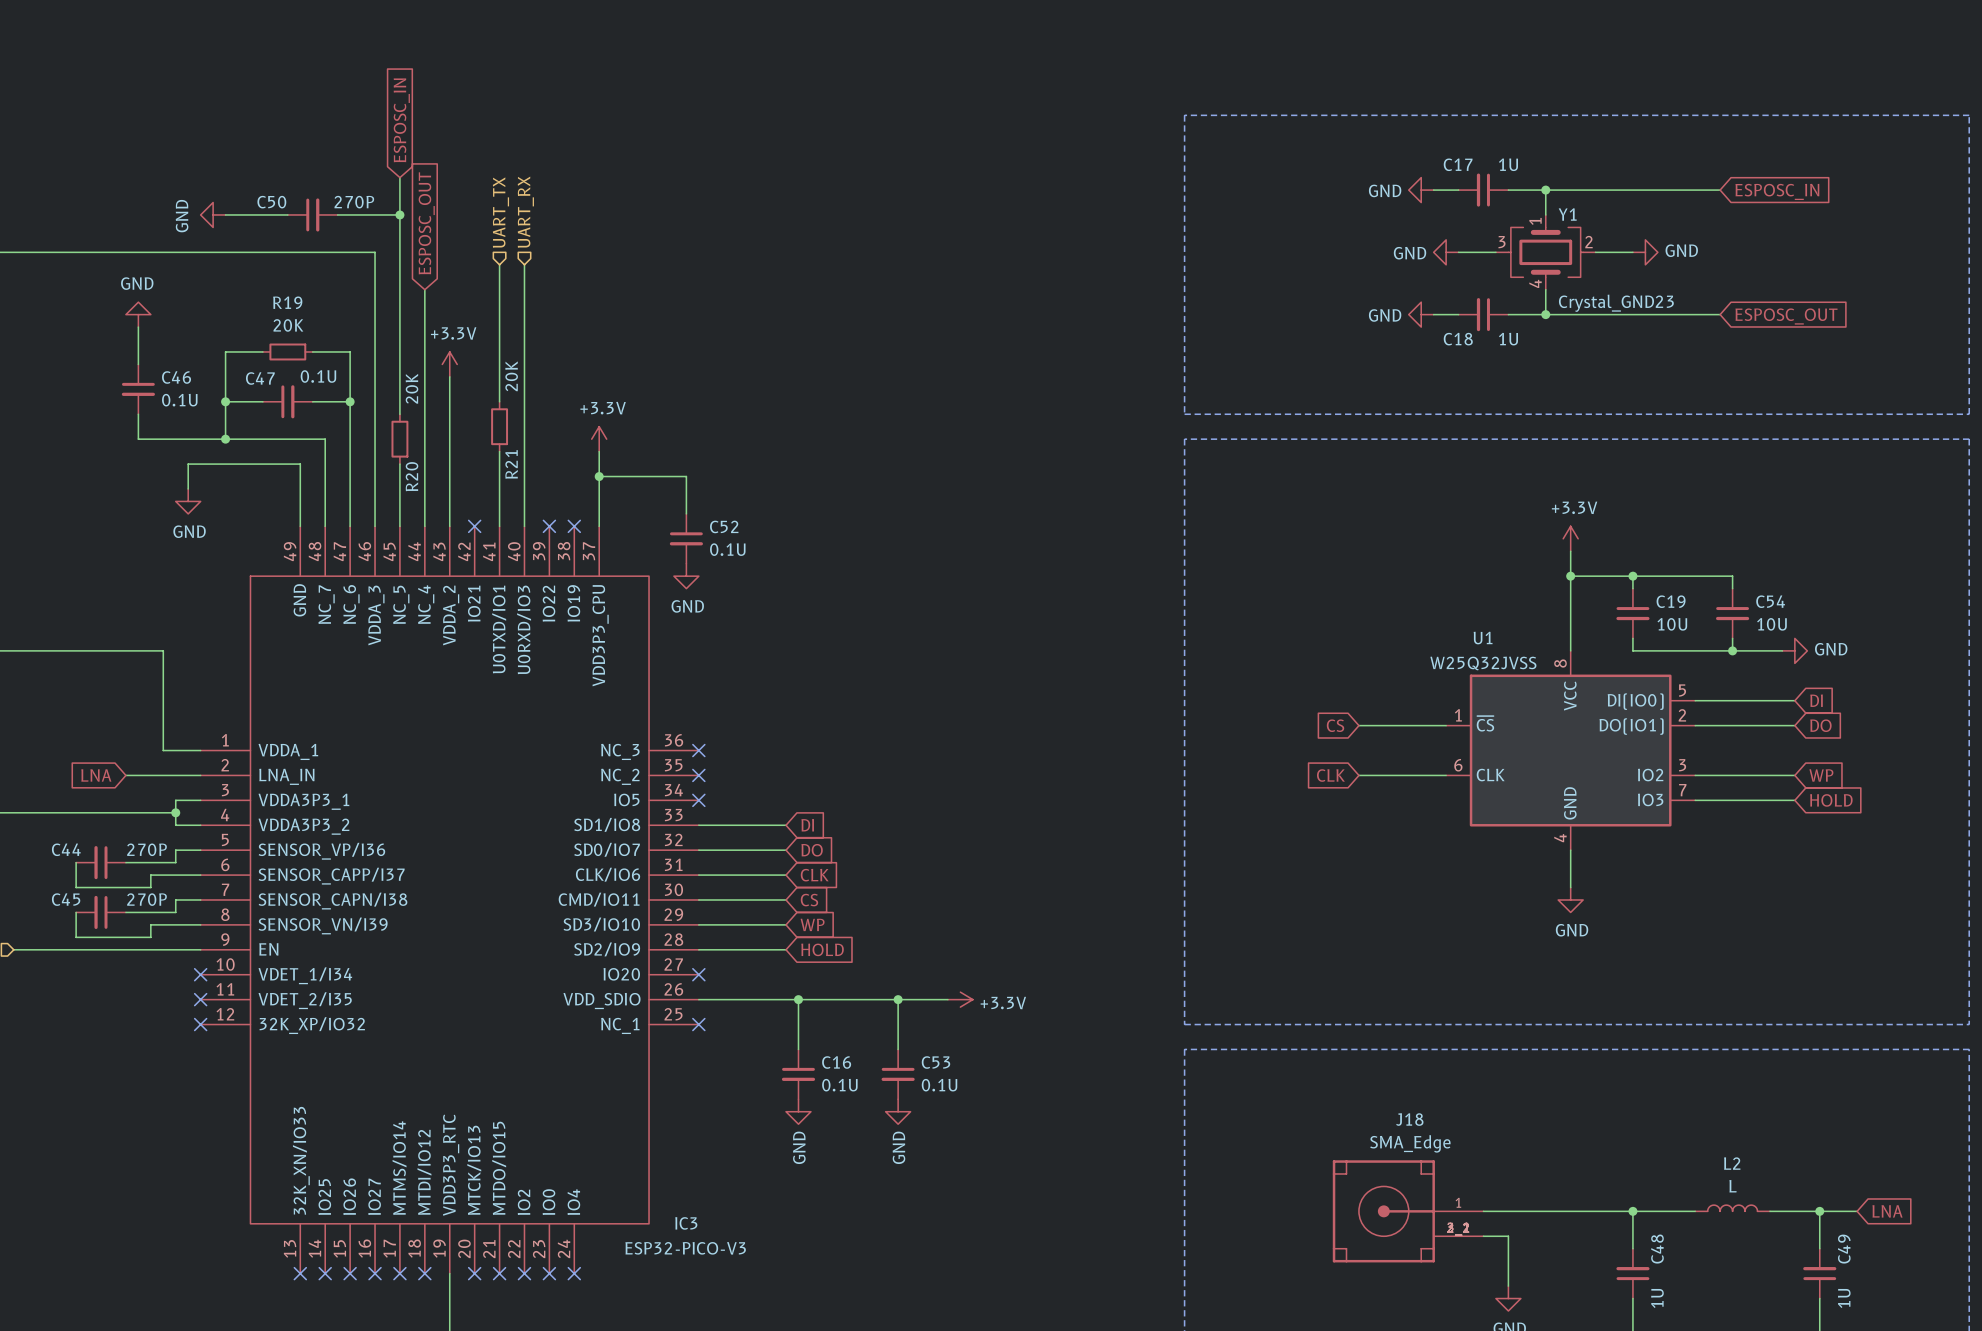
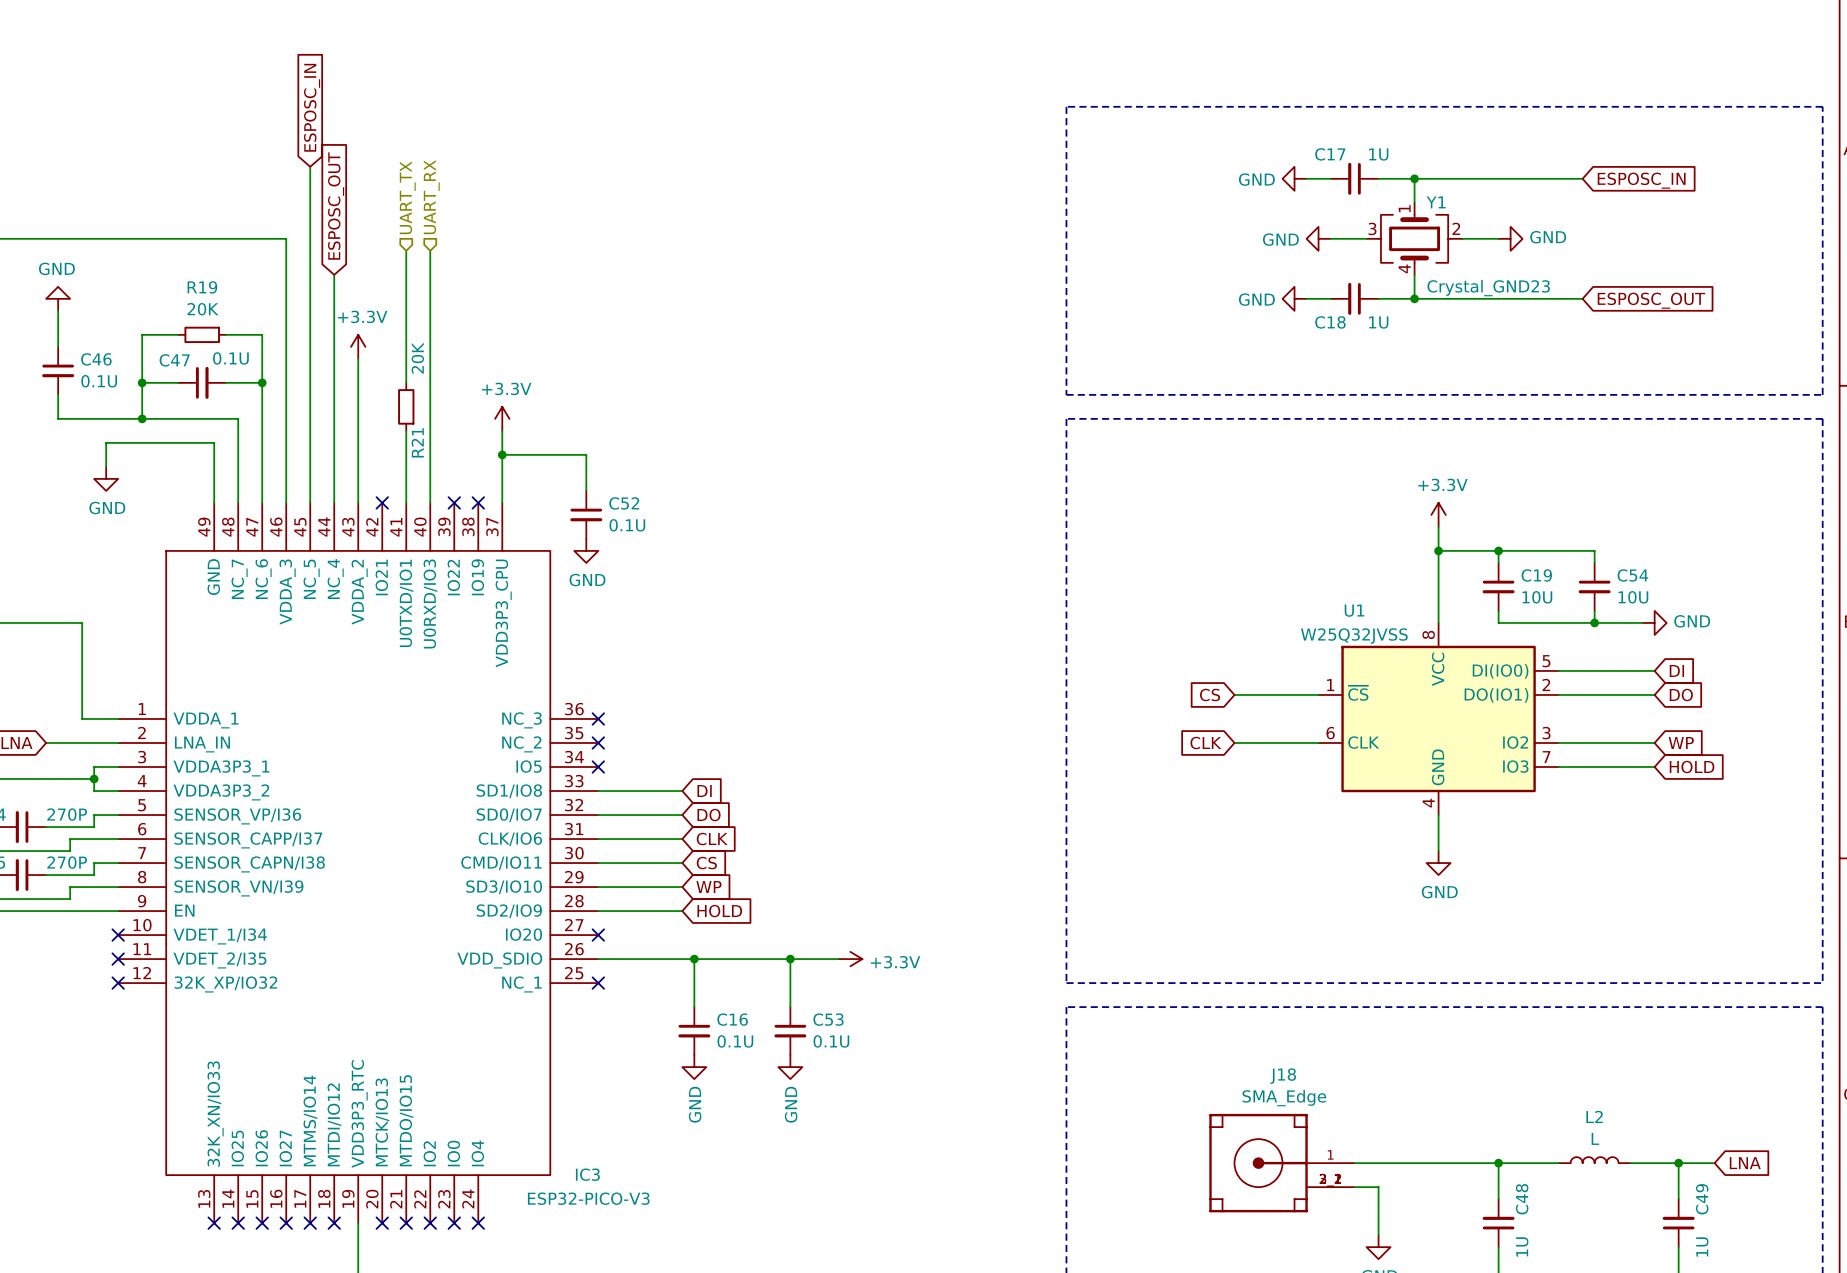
power symbol: GND (213, 214) -> none
wire: (225, 214) (287, 214) -> none
C50: 270P (312, 214) -> none
wire: (337, 214) (399, 214) -> none
junction: (399, 214) -> none
wire: none -> (310, 394) (310, 442)
R20: 20K (399, 439) -> none

